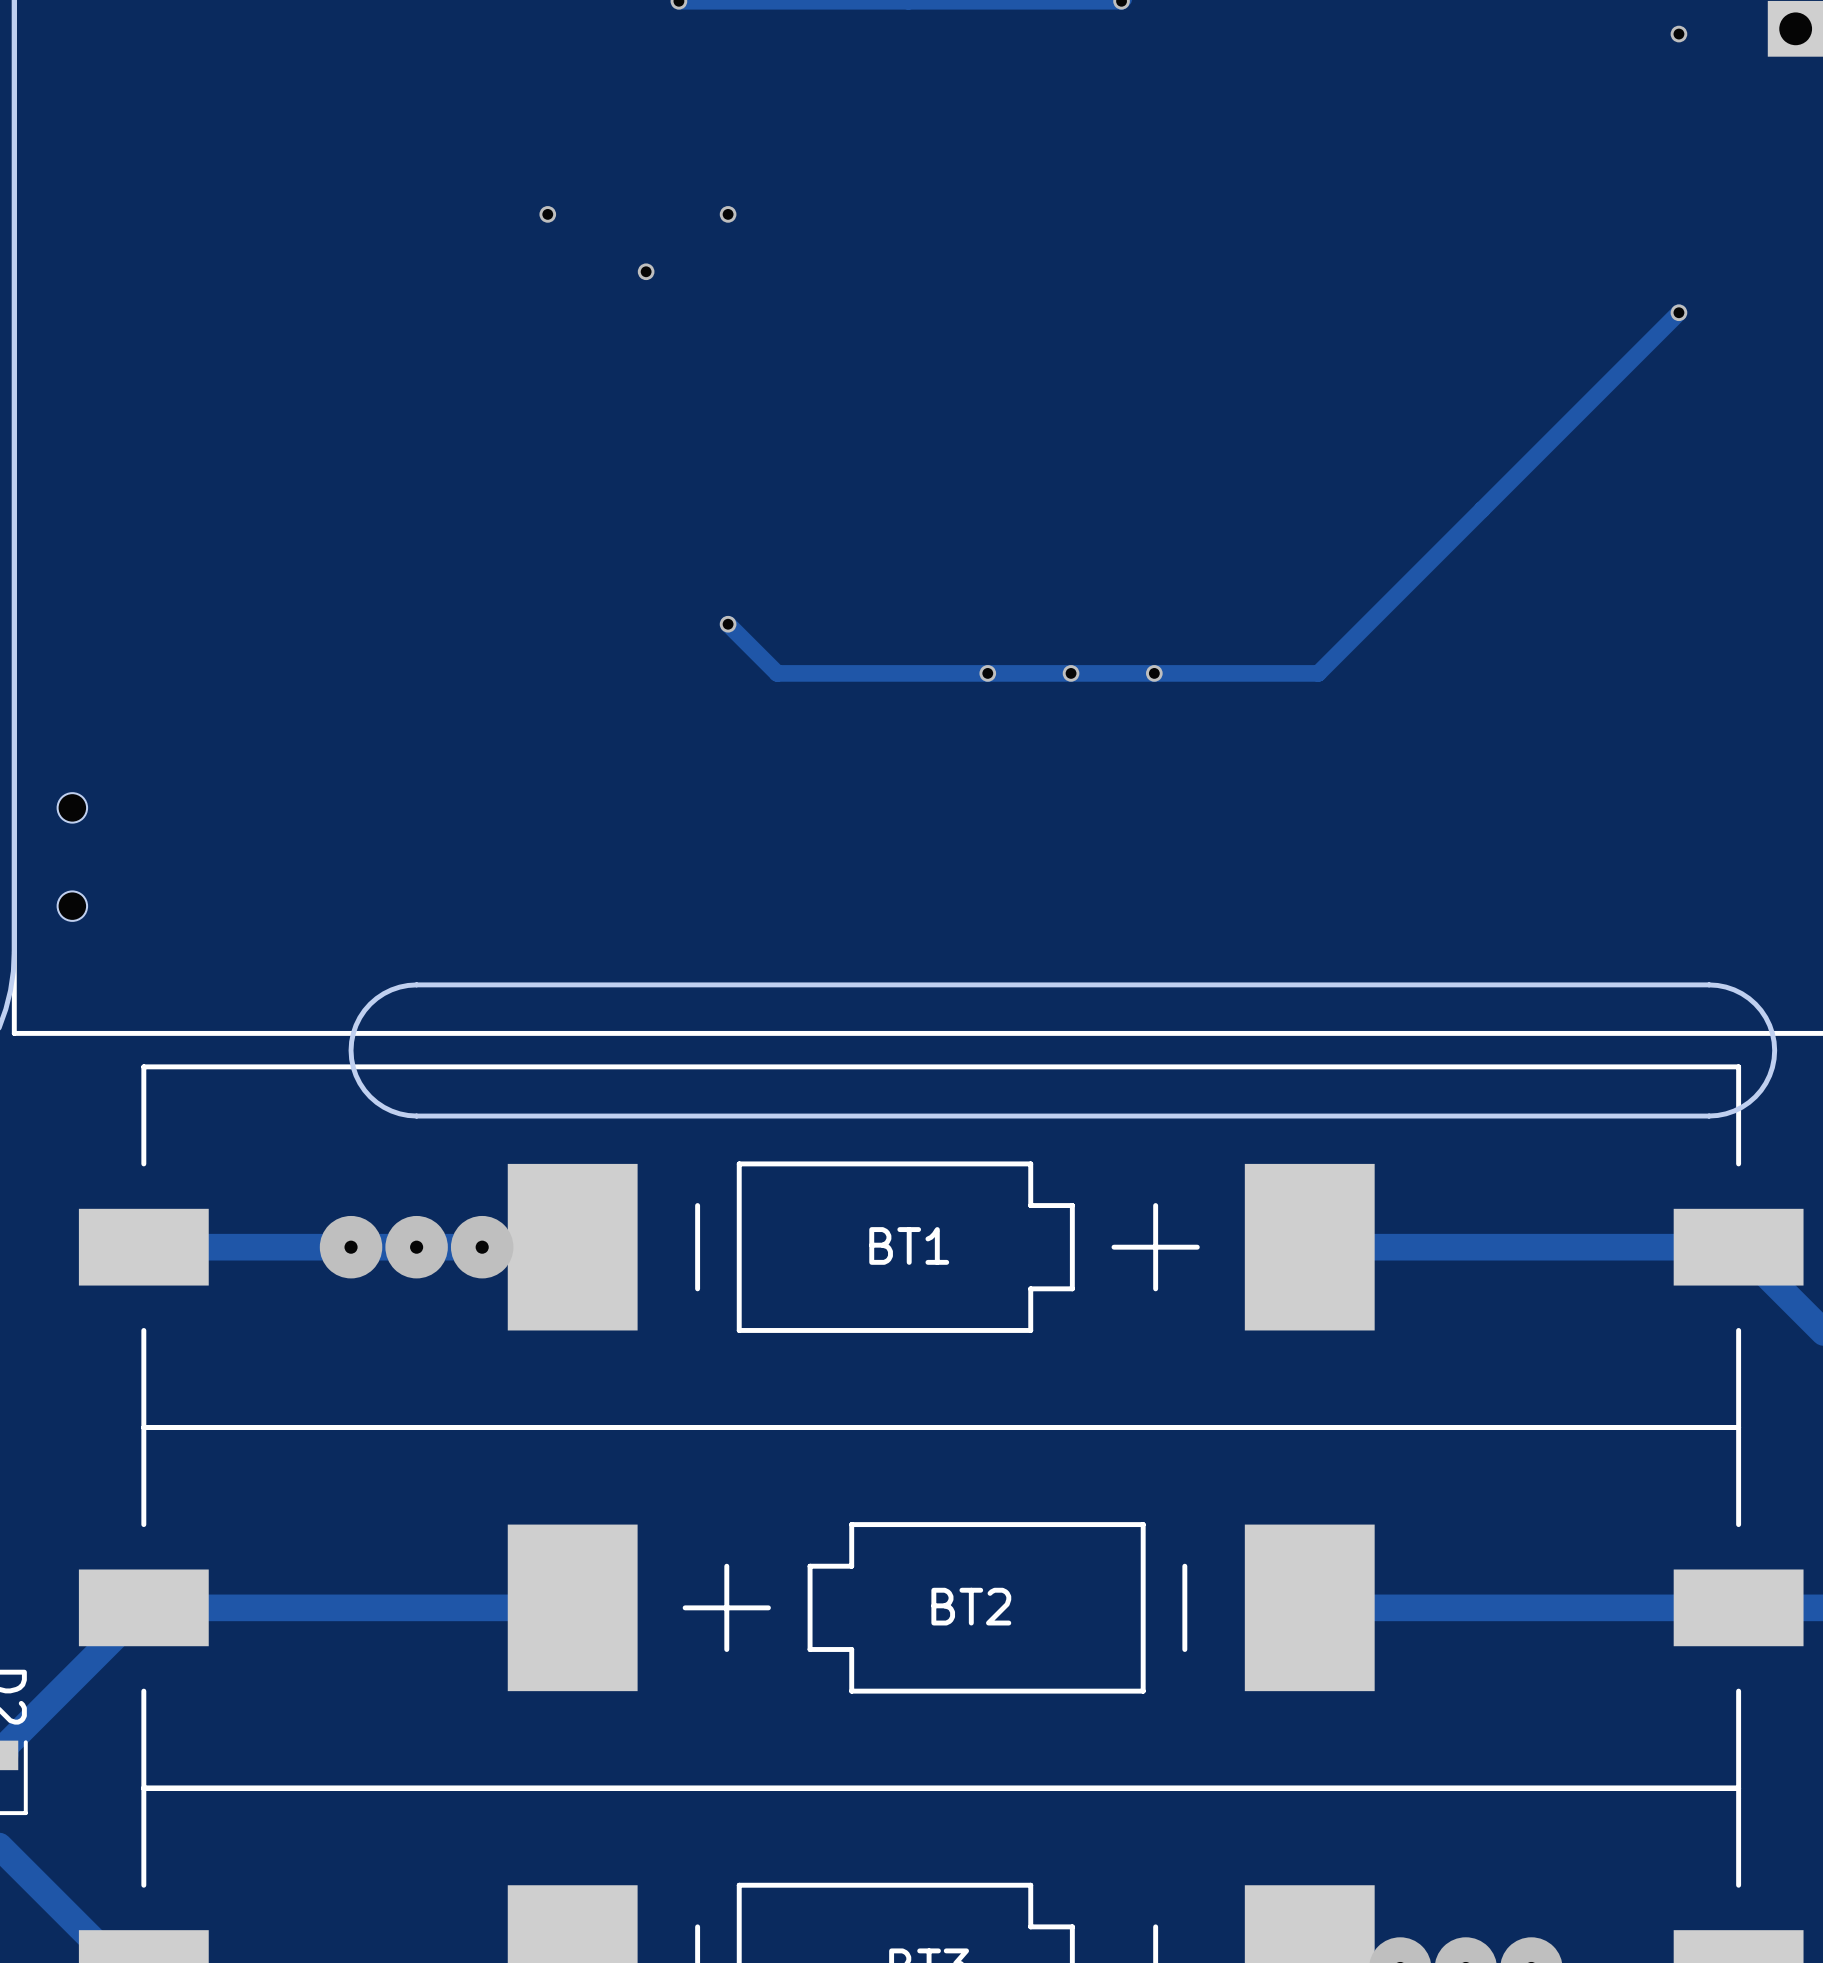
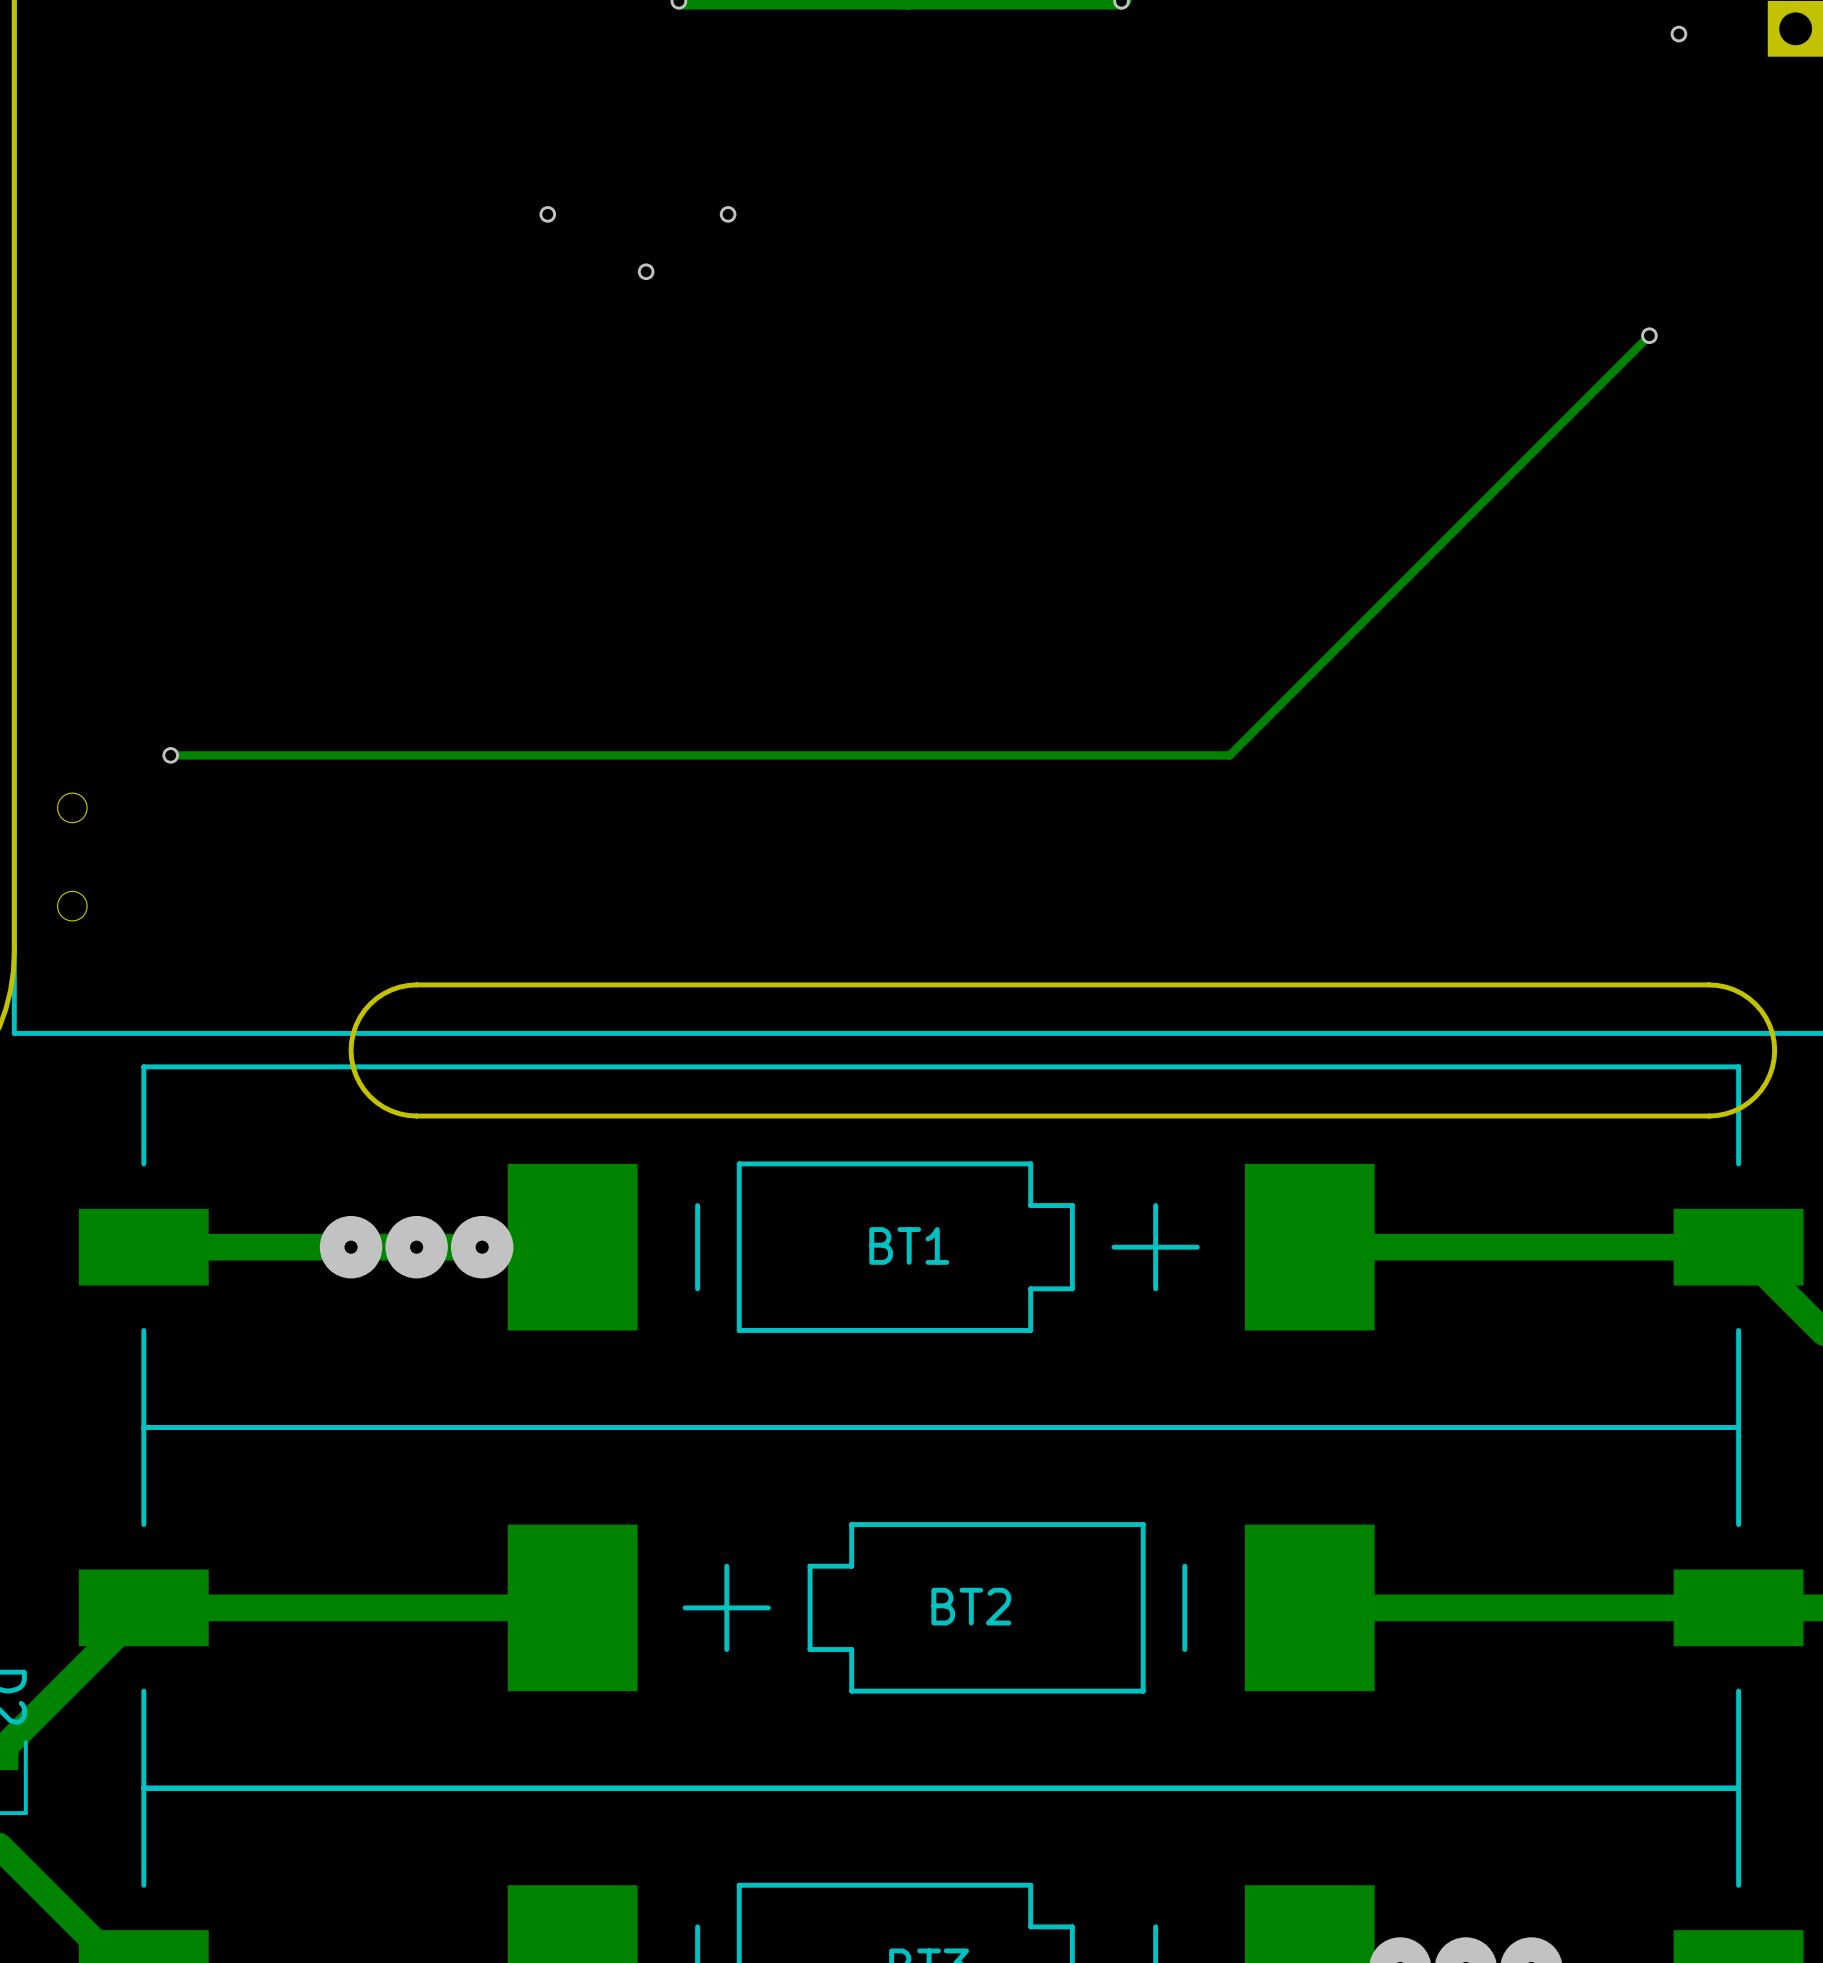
track: (1678, 312) (1318, 673) (777, 673) (728, 624) -> none
via position: (1678, 312) -> (1649, 335)
track: none -> (1649, 335) (1229, 755) (170, 755)
via: (728, 624) -> none
via: (987, 673) -> none
via: (1071, 673) -> none
via: (1154, 673) -> none
via: none -> (170, 755)

